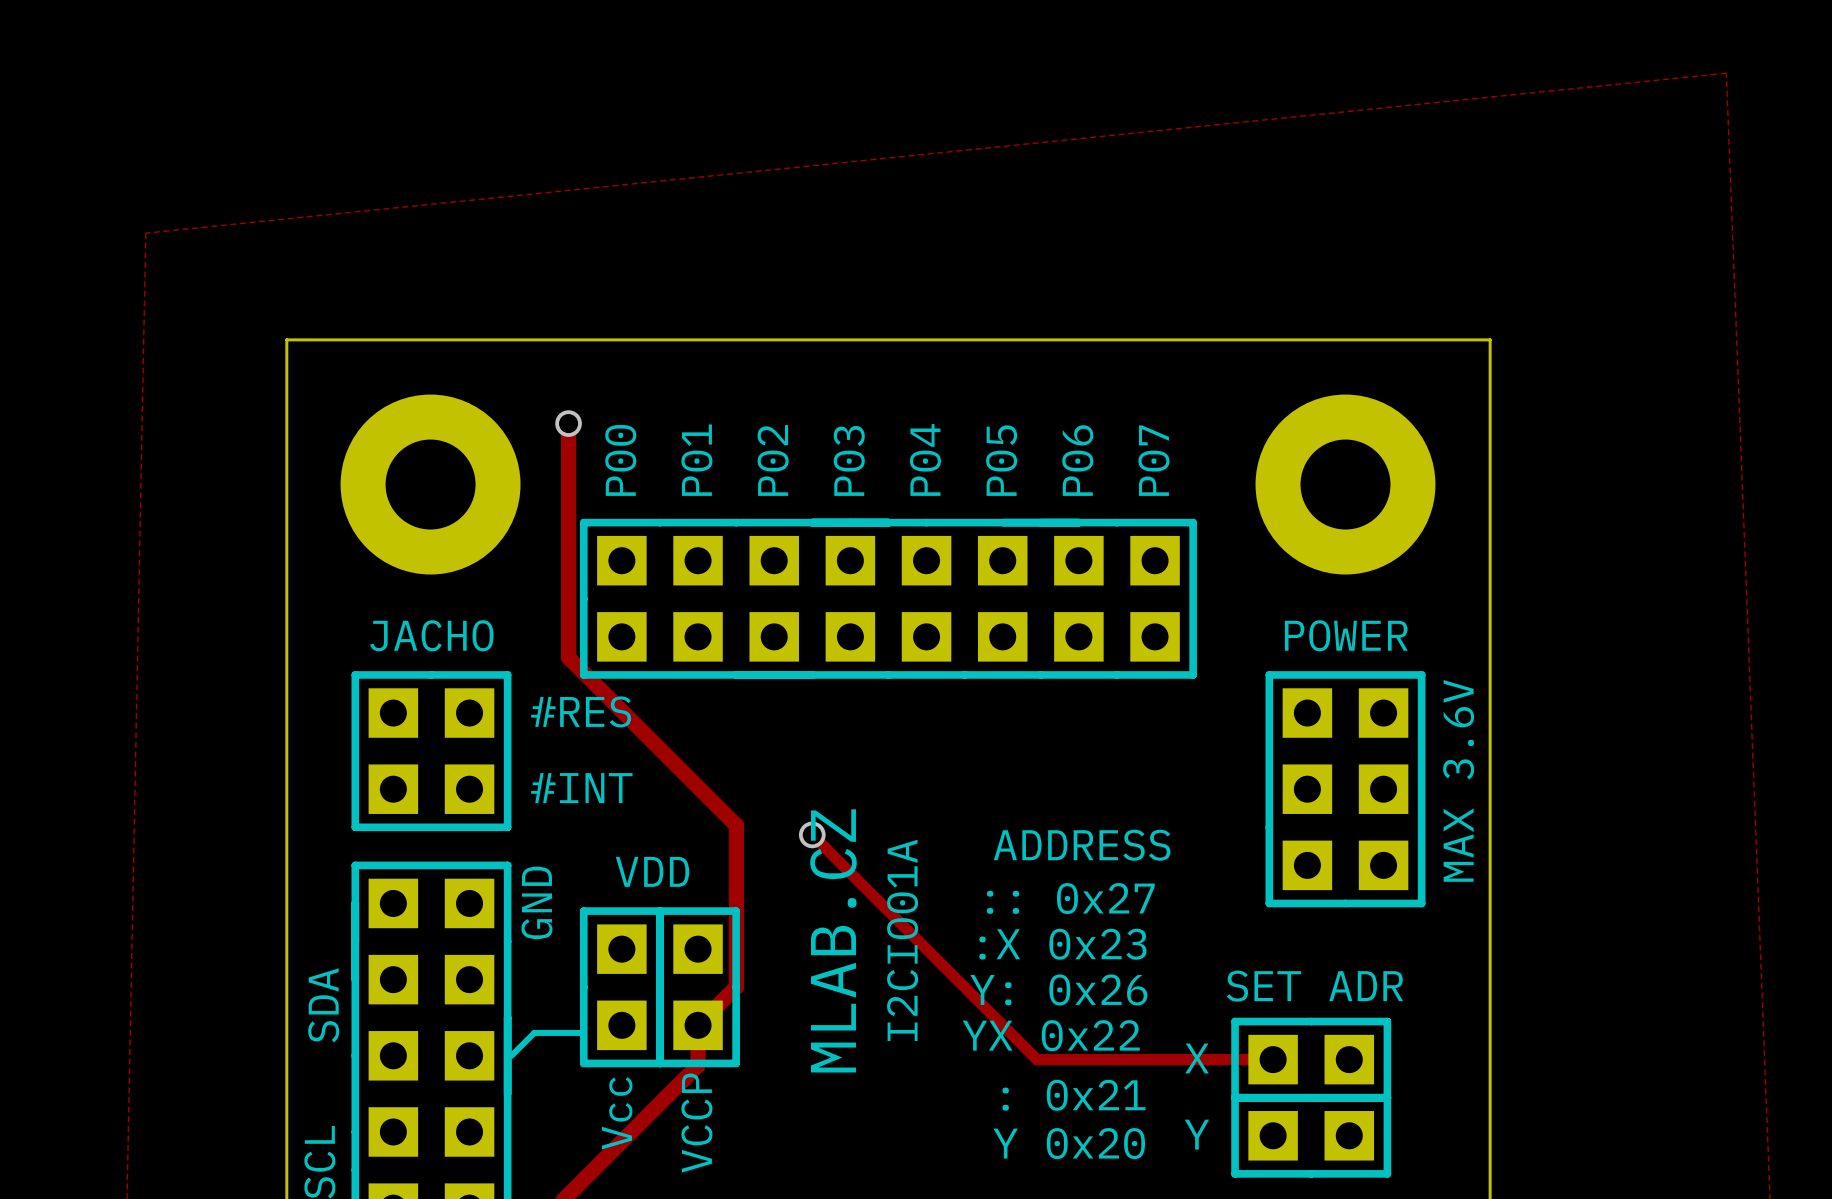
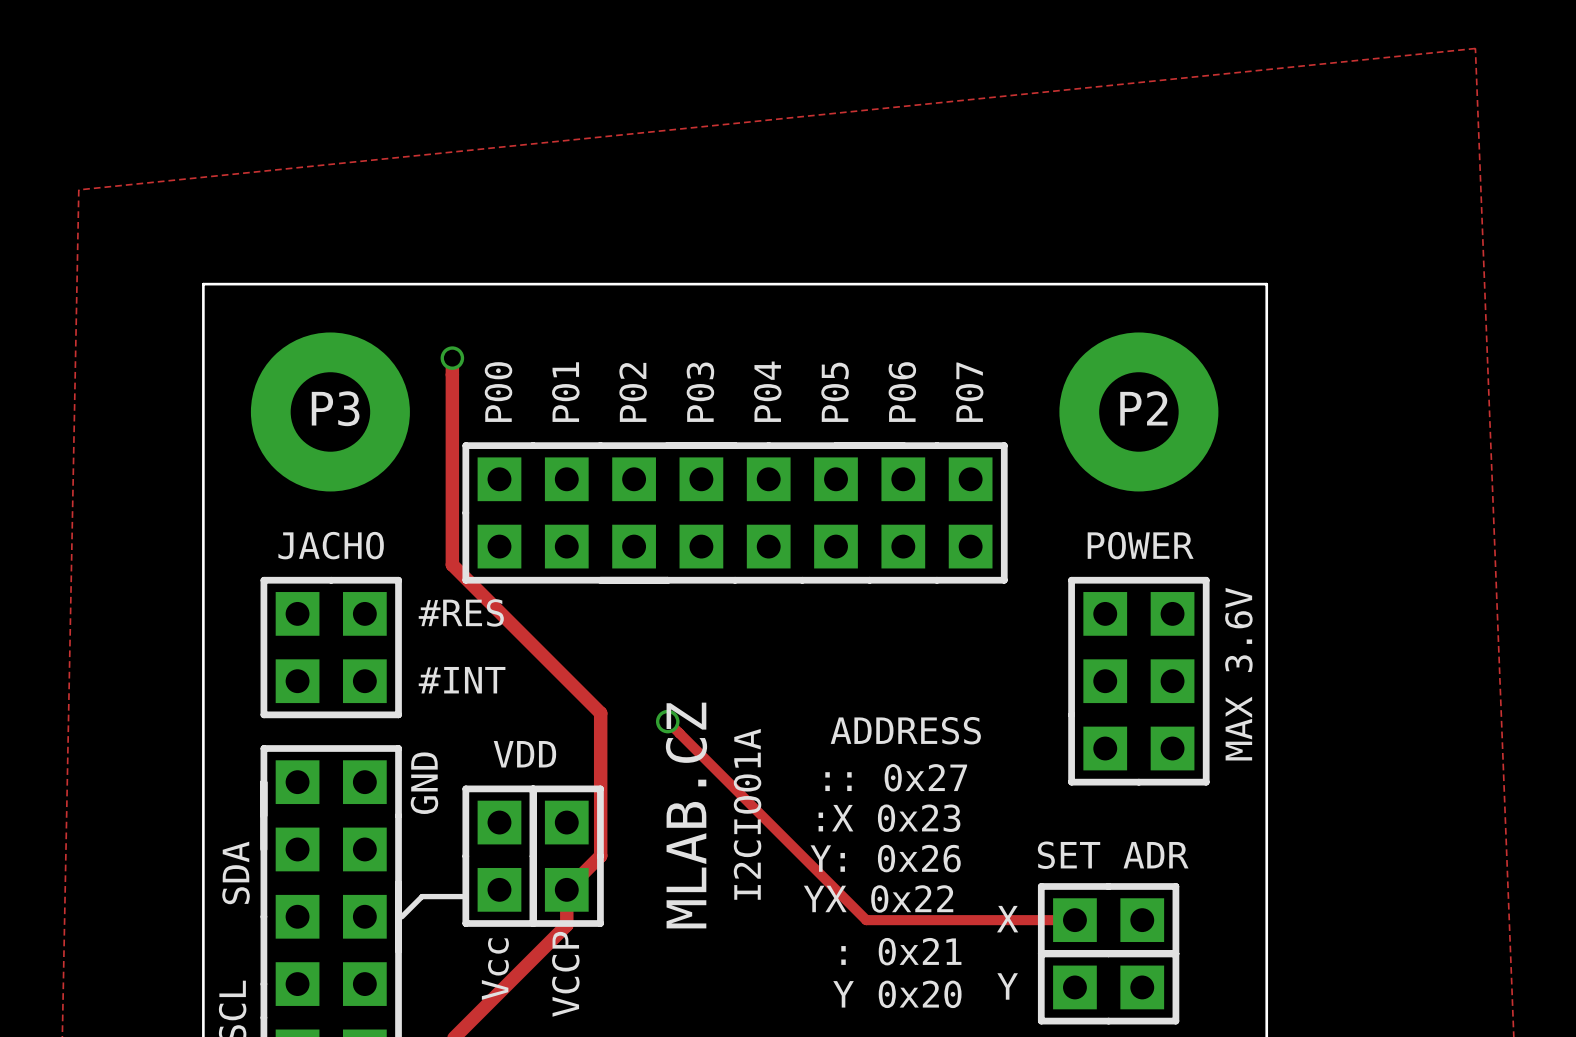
P3 name: none -> P3 (335, 408)
P2 name: none -> P2 (1143, 408)

